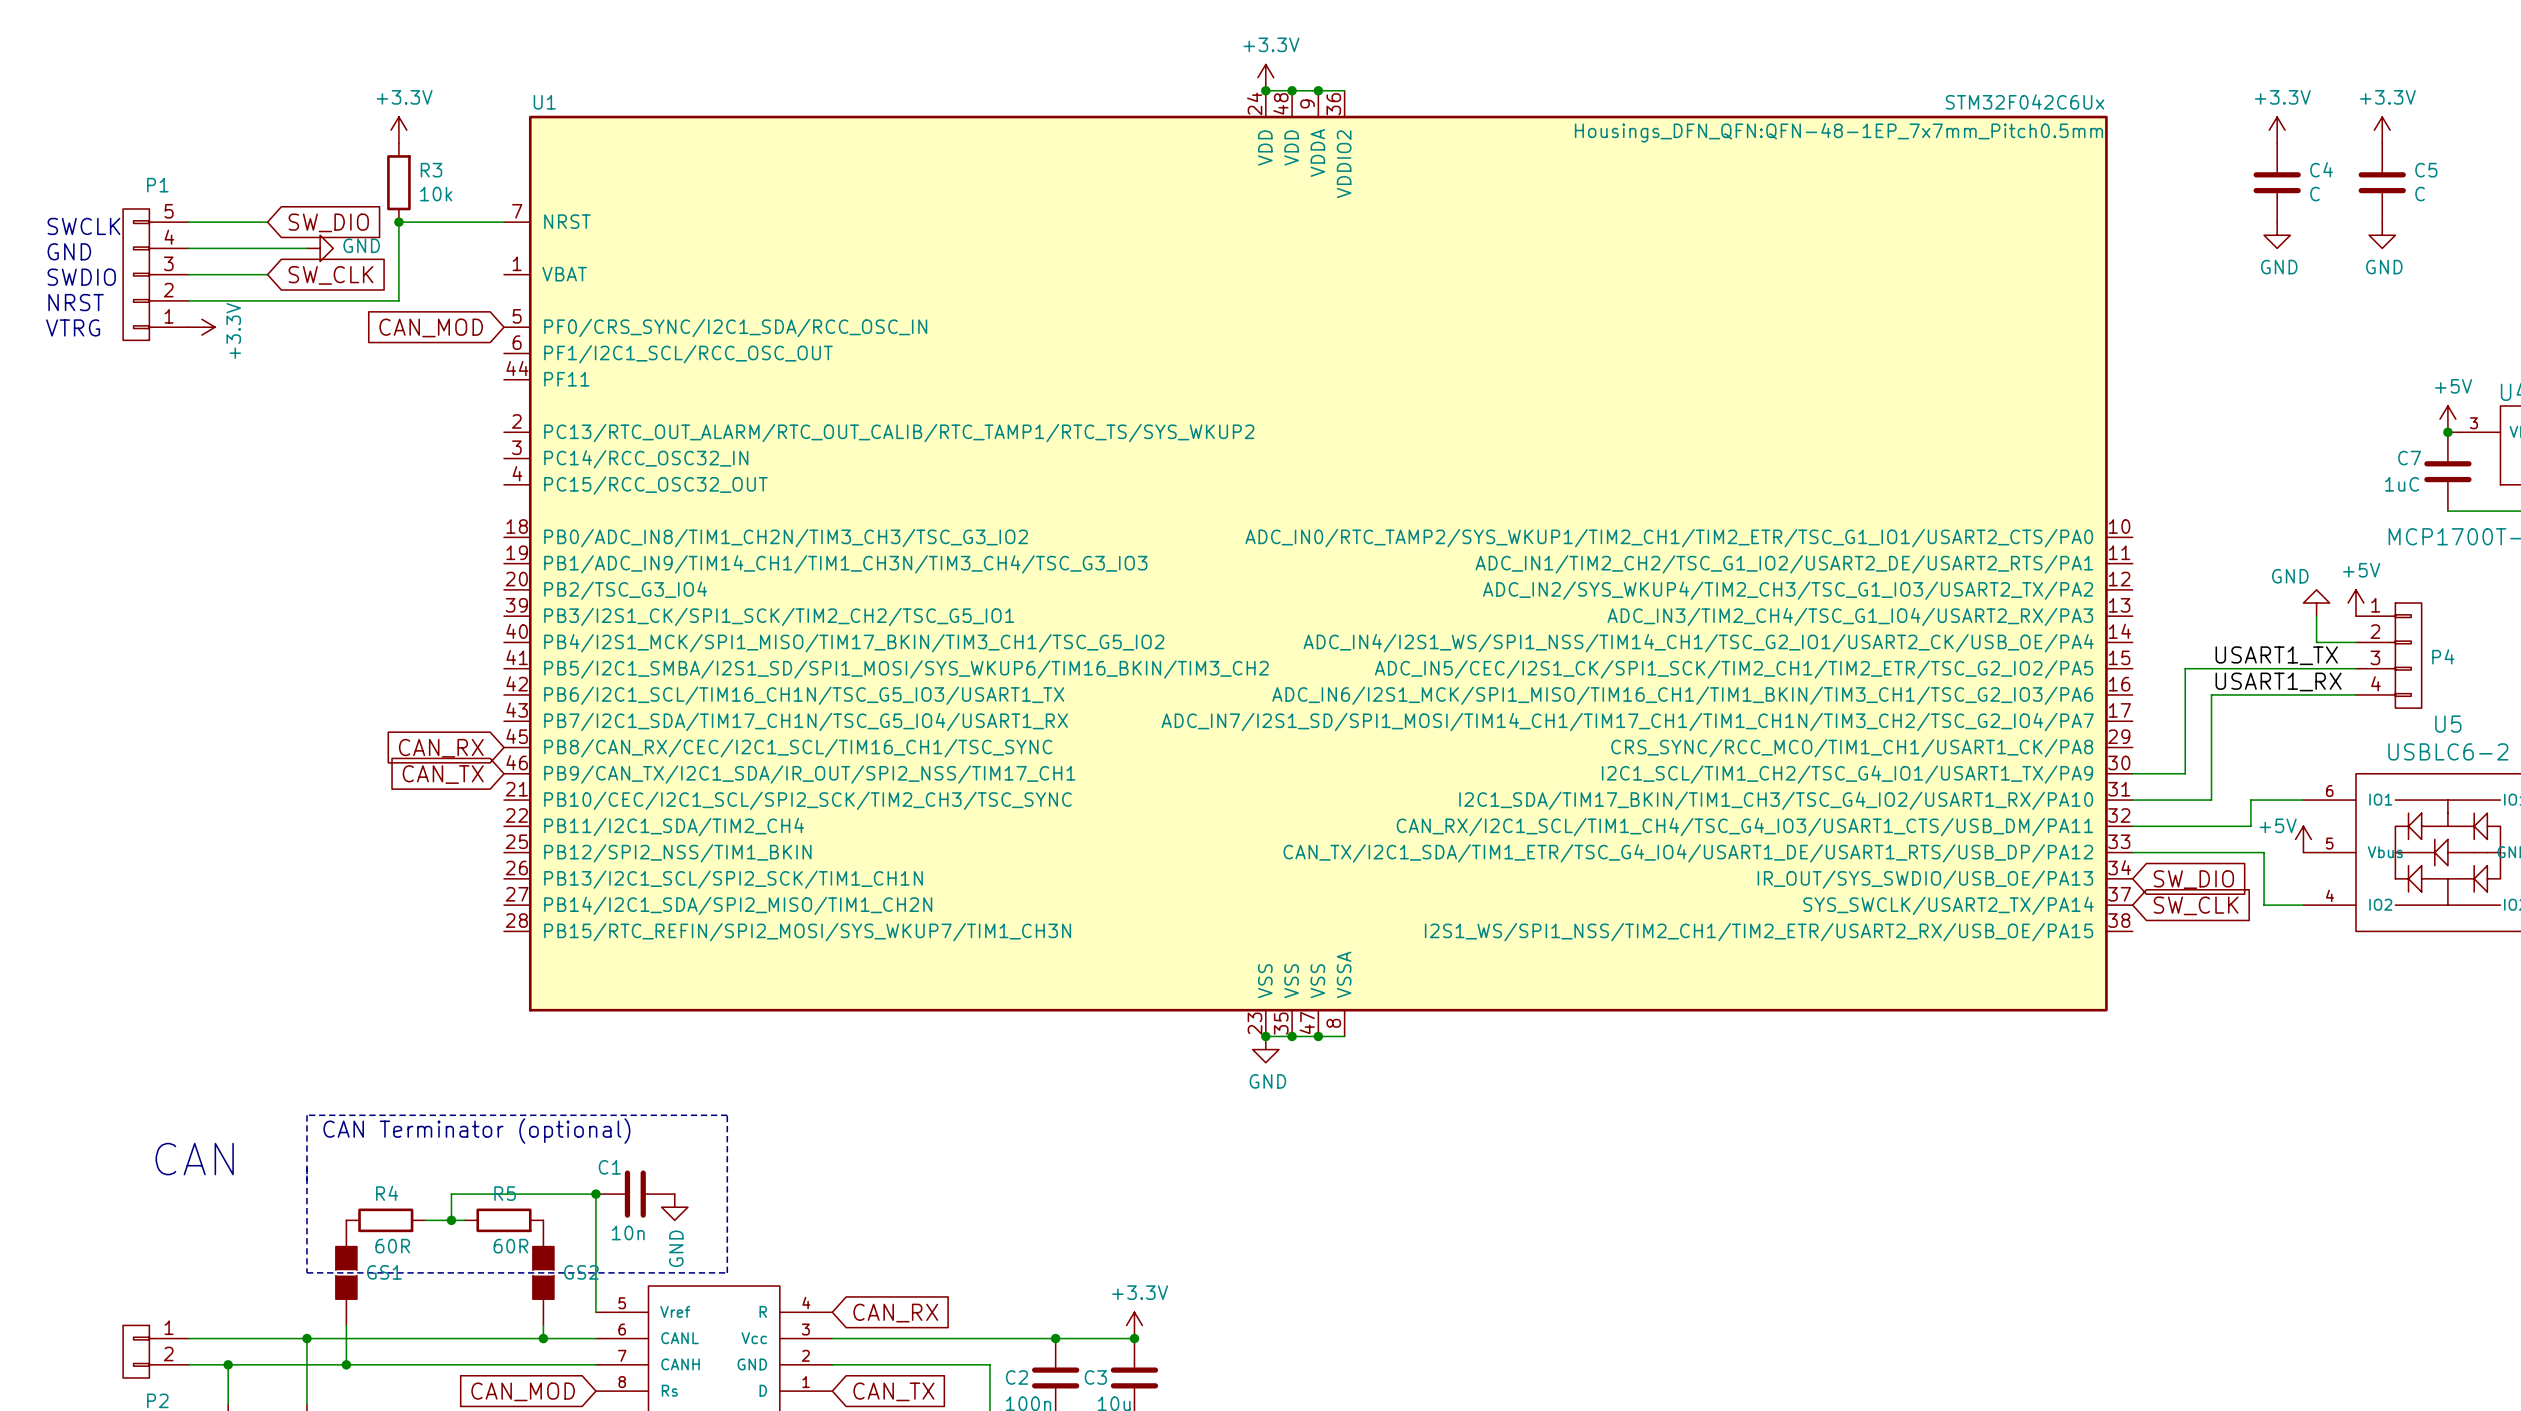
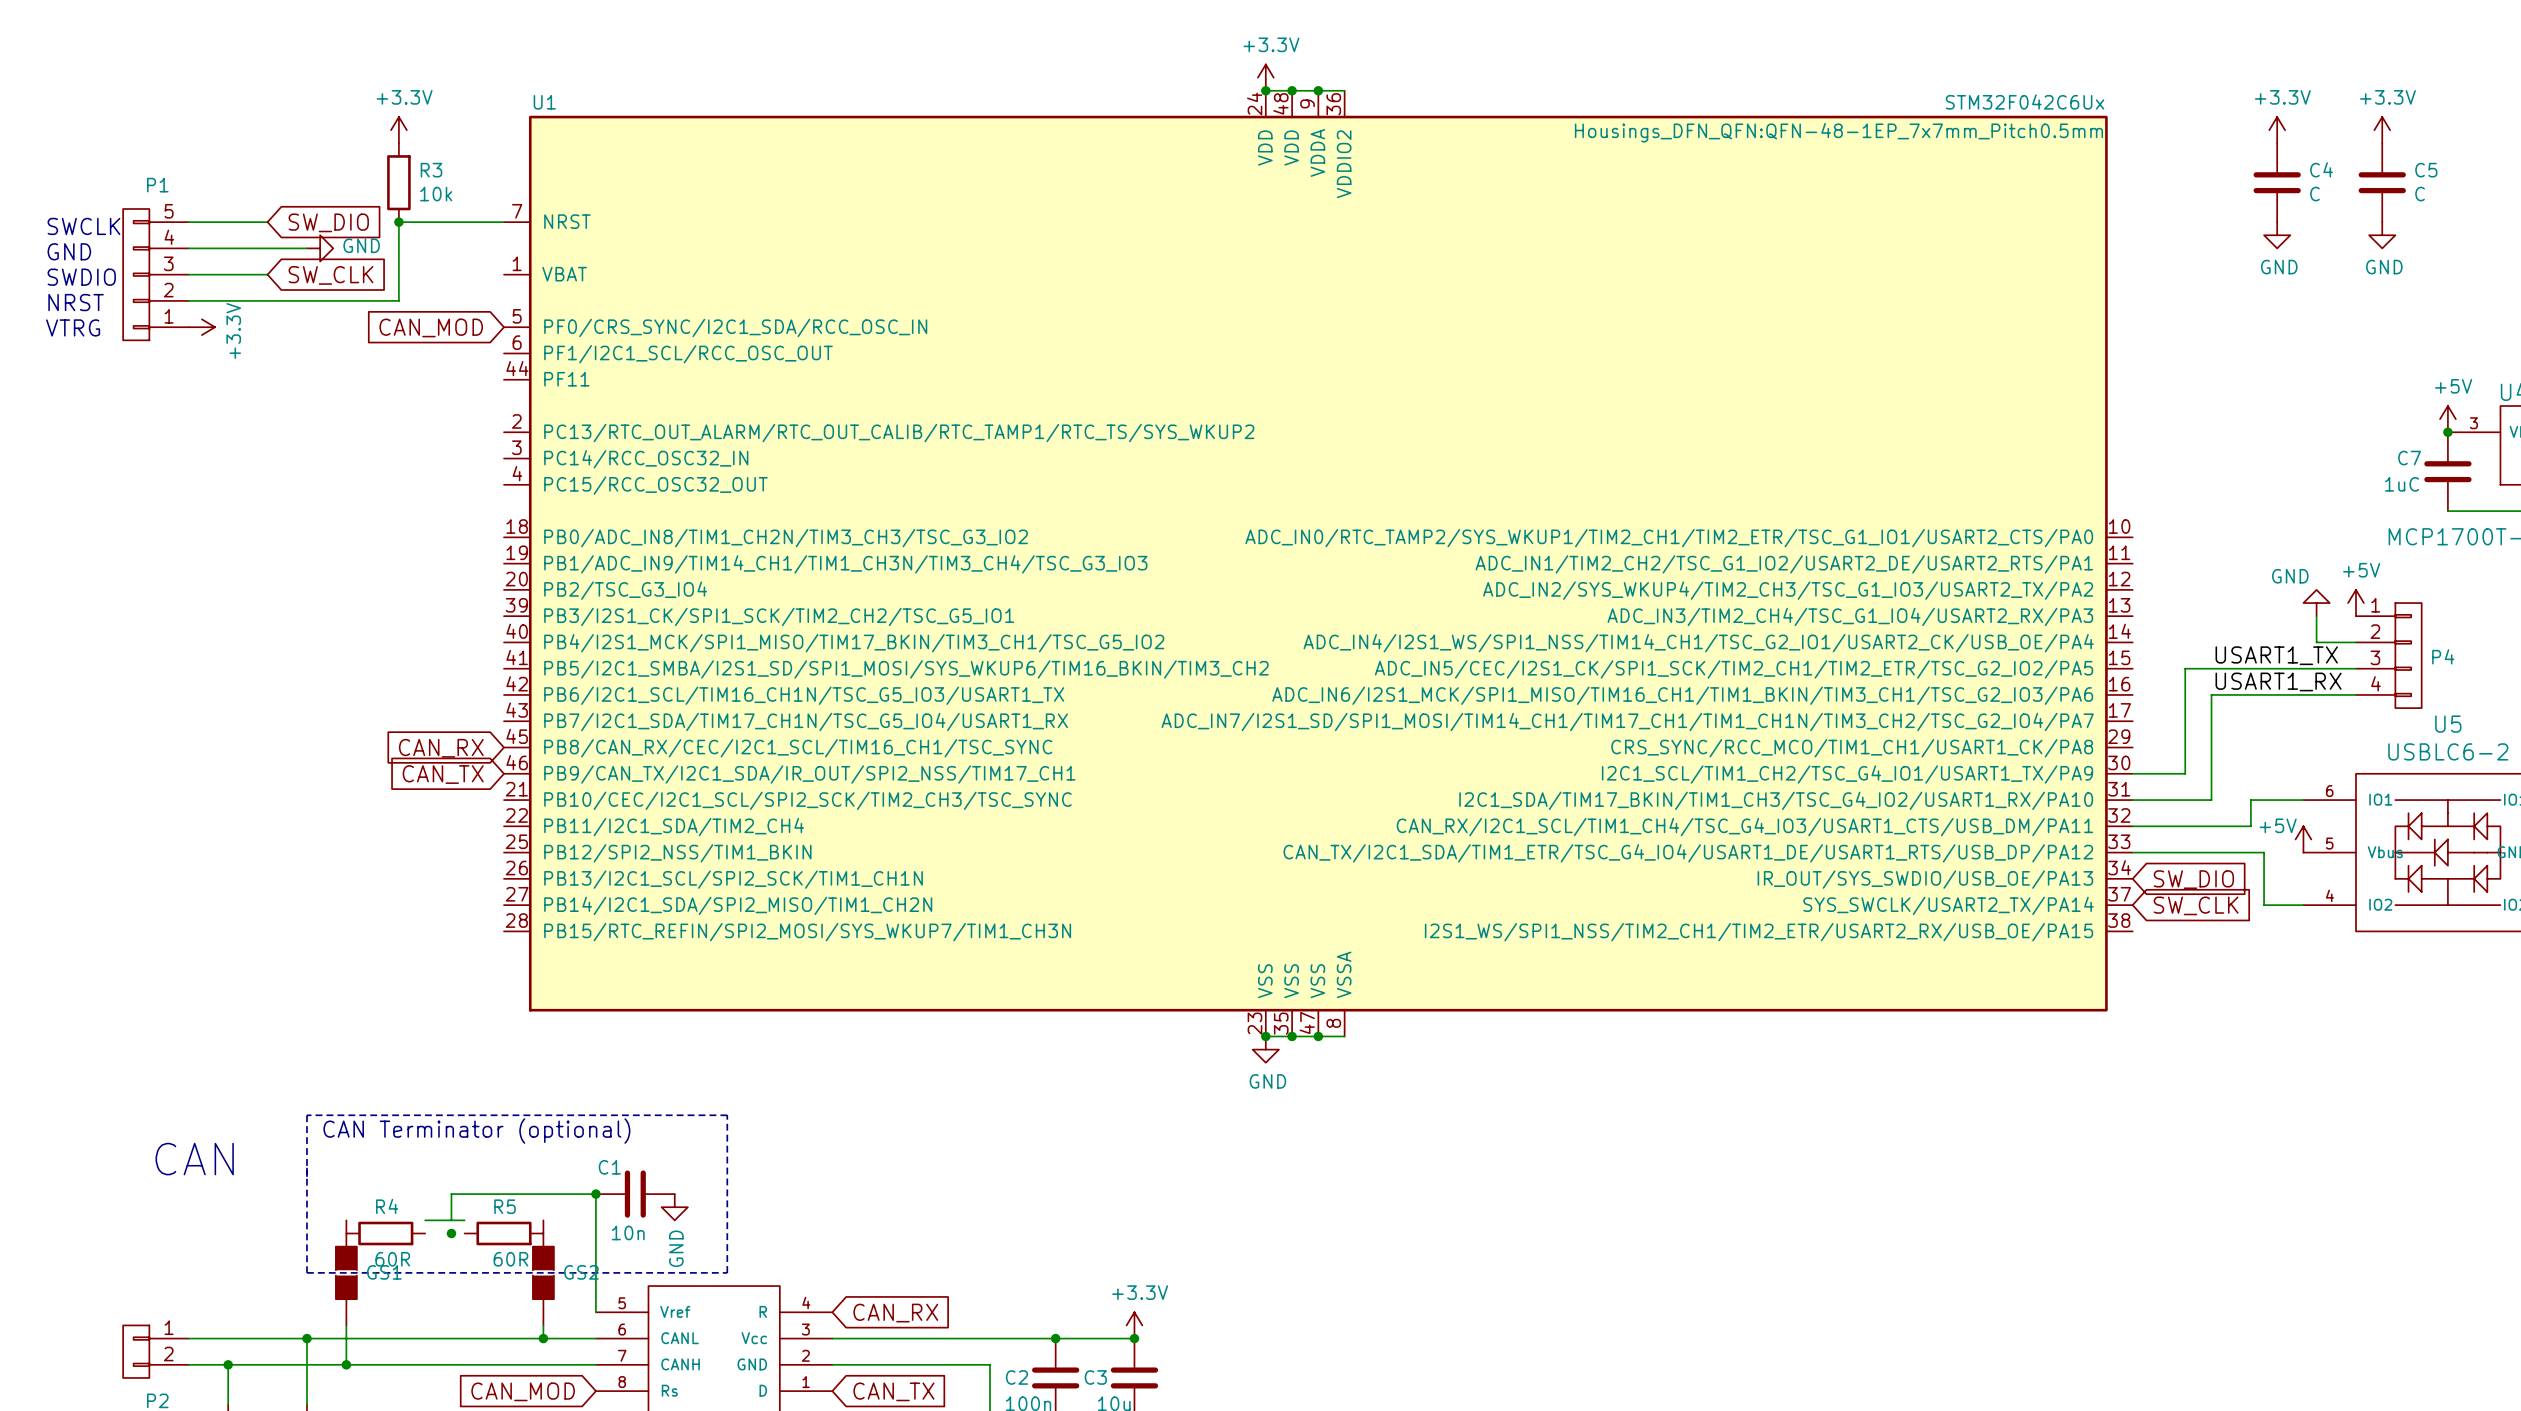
R4 position: (385, 1220) -> (385, 1233)
junction position: (451, 1220) -> (451, 1233)
R5 position: (504, 1220) -> (504, 1233)

